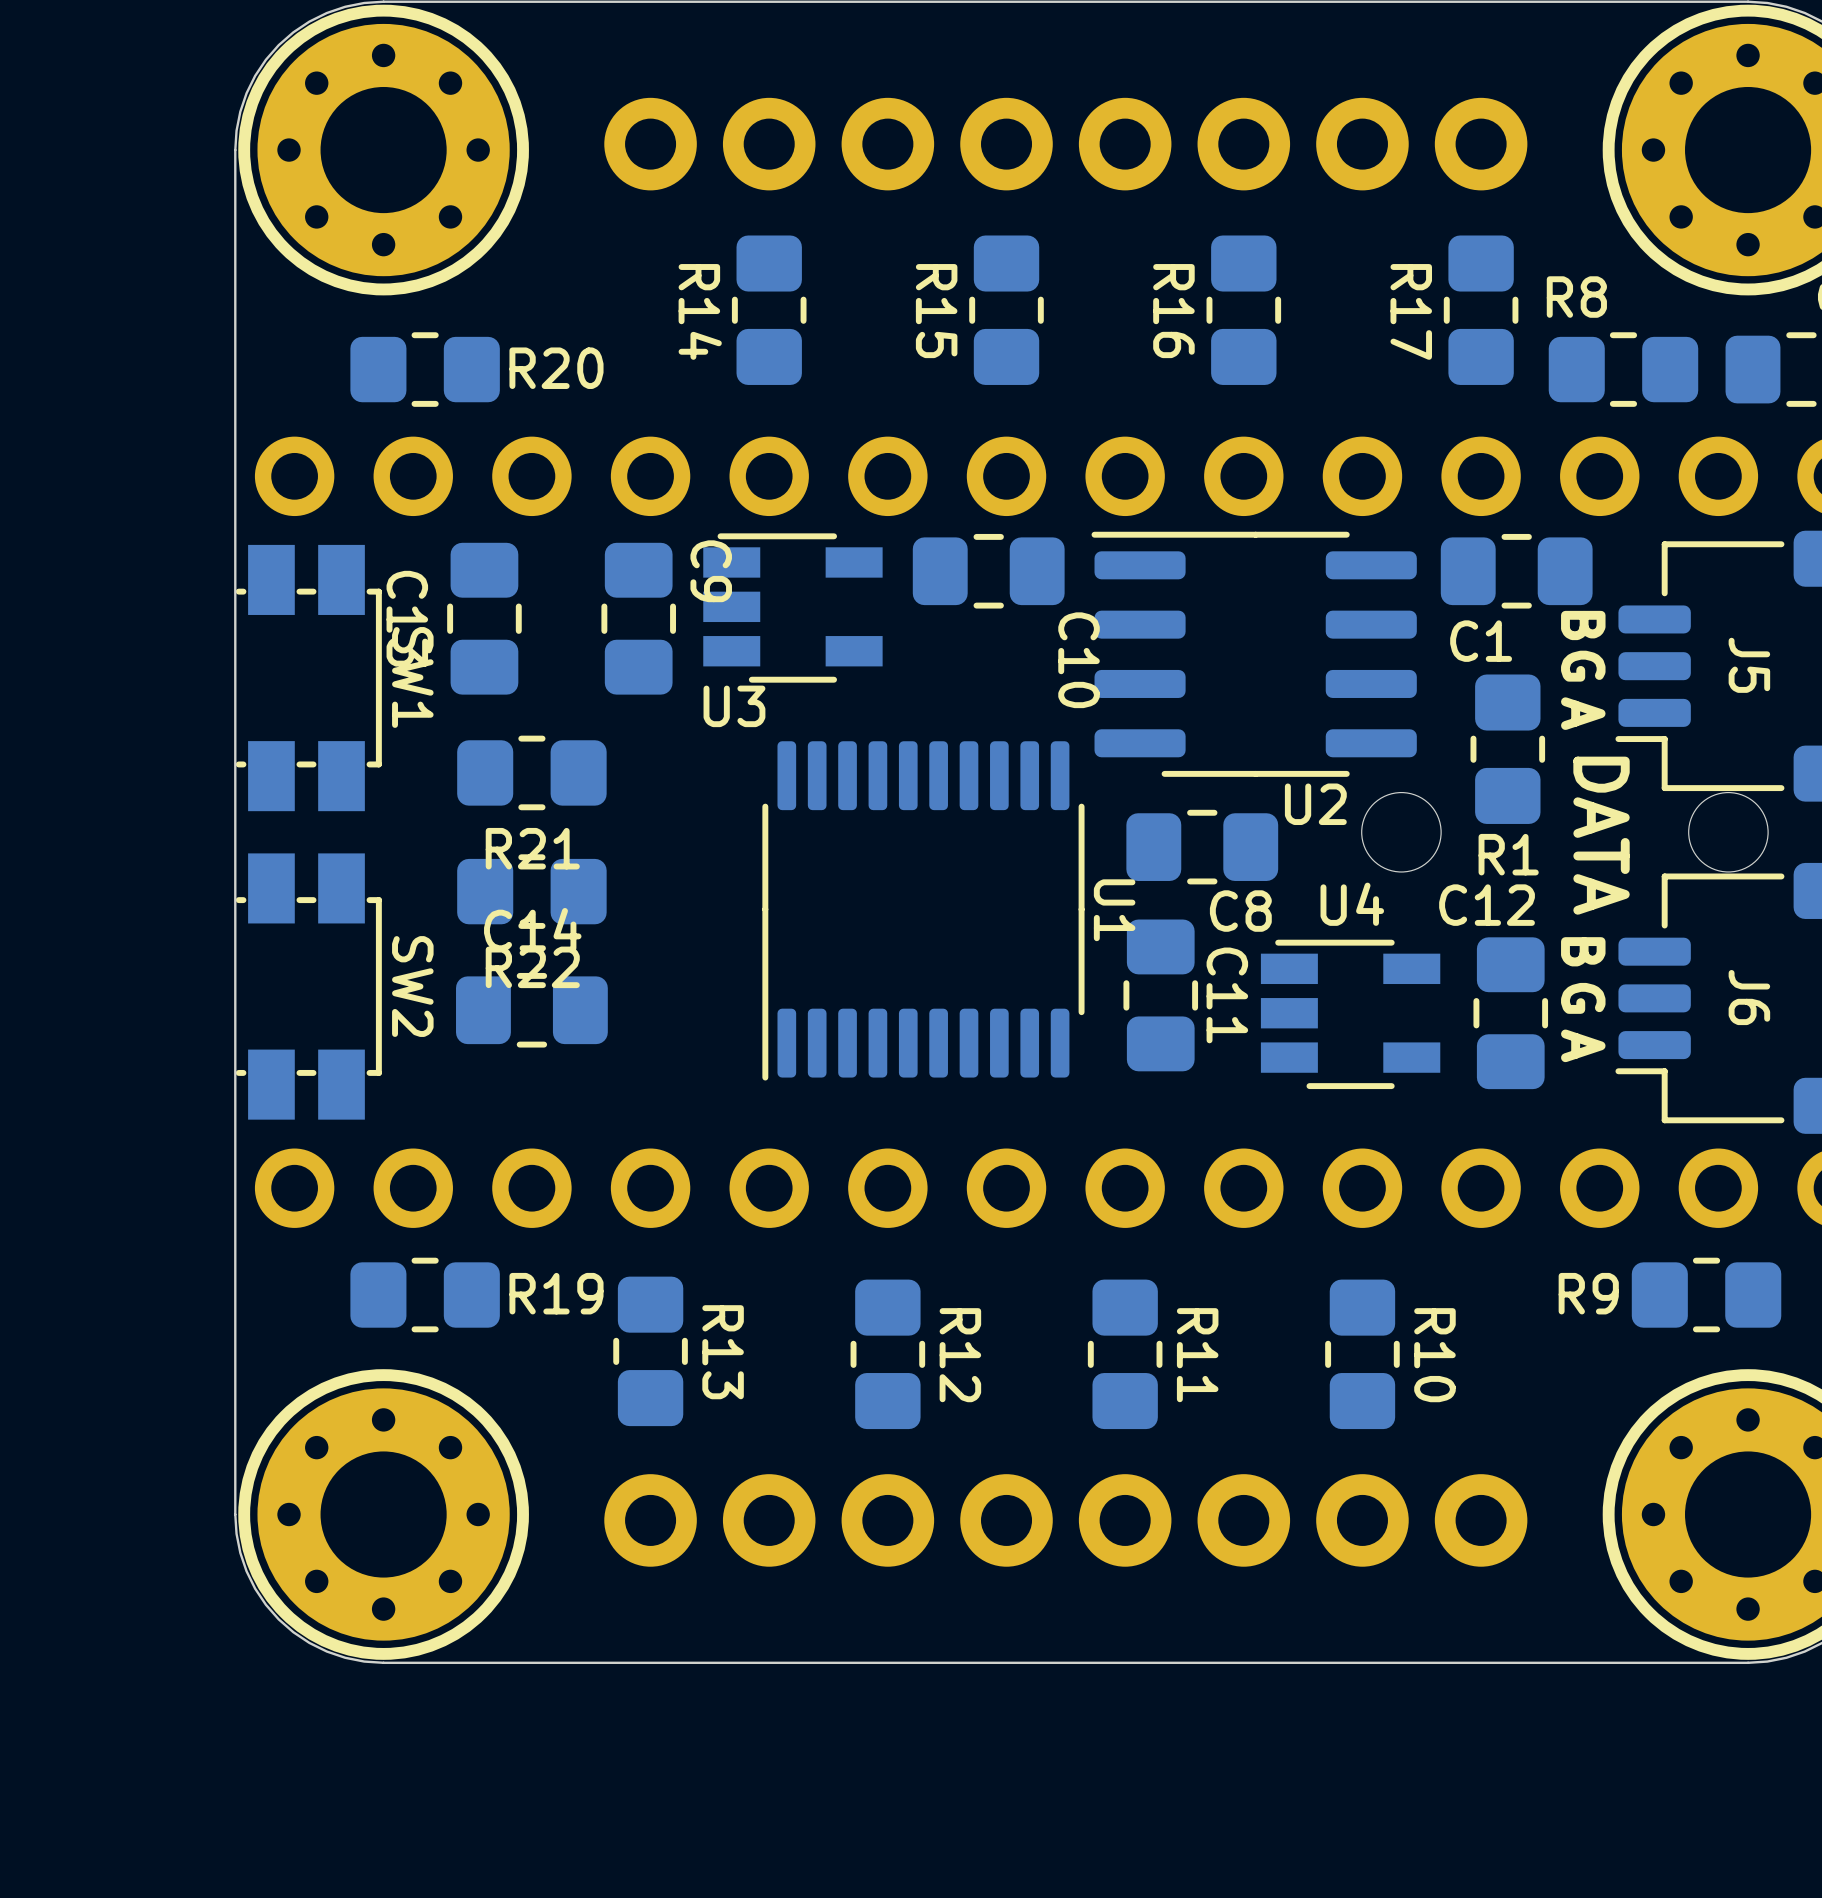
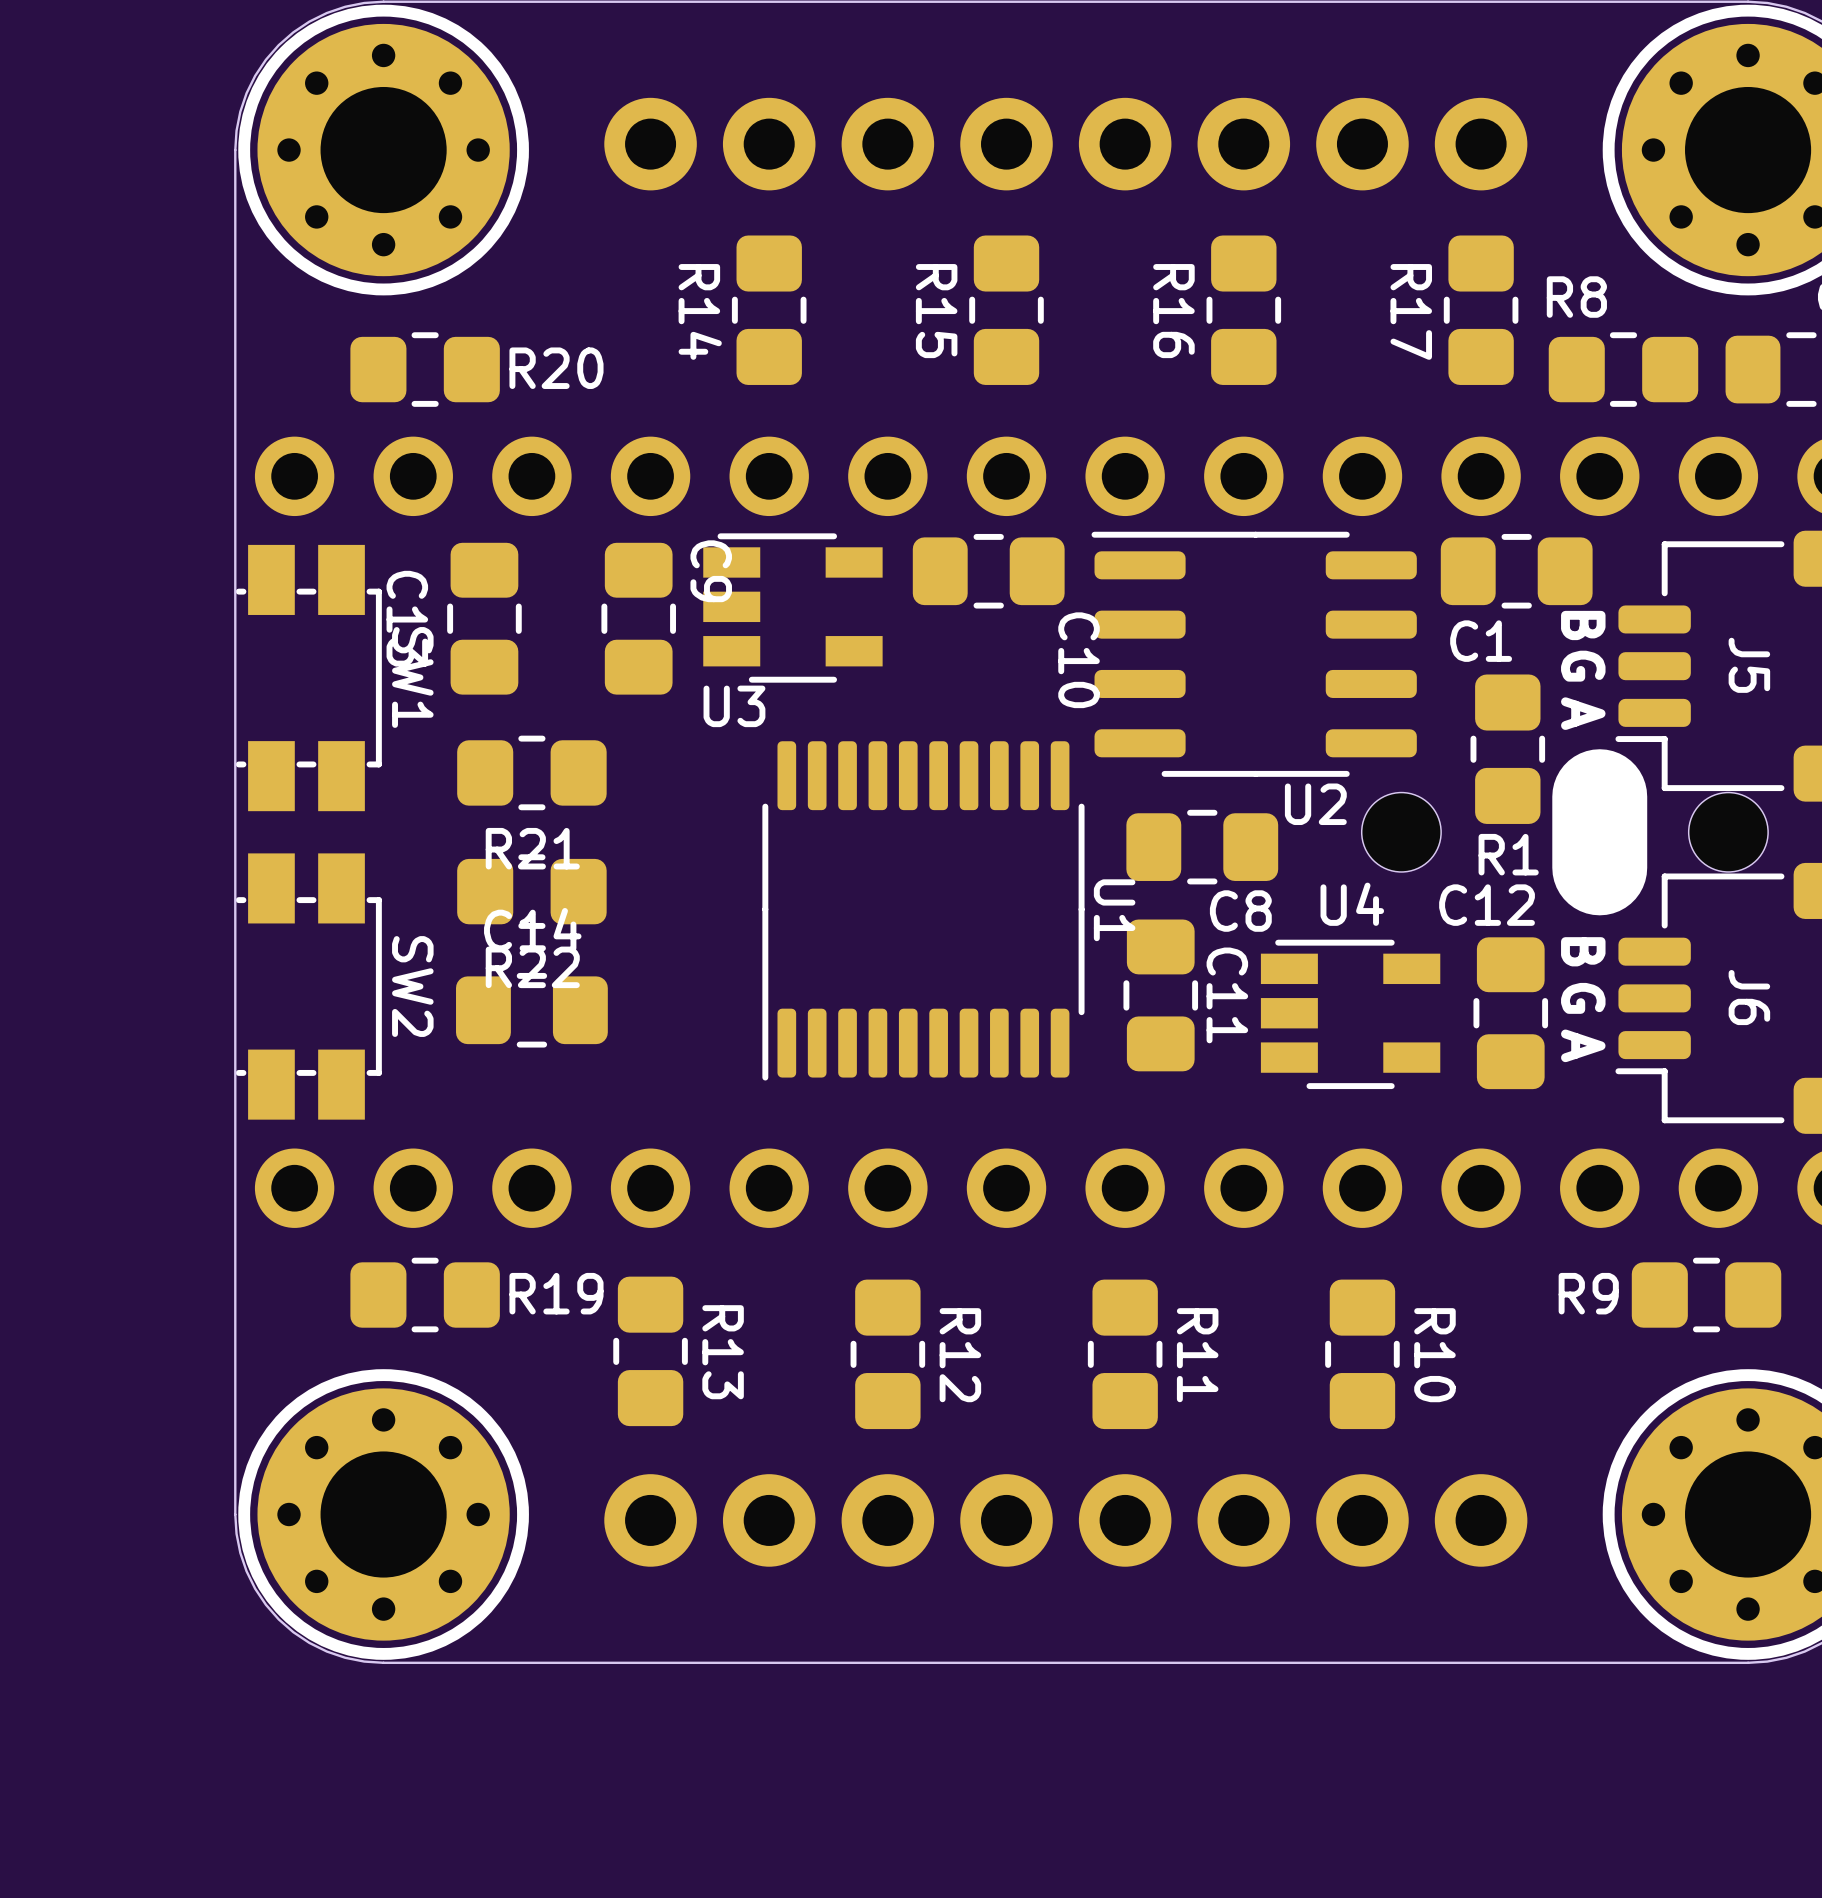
line: none -> (1599, 796) (1599, 867)
text: DATA (1601, 835) -> none

